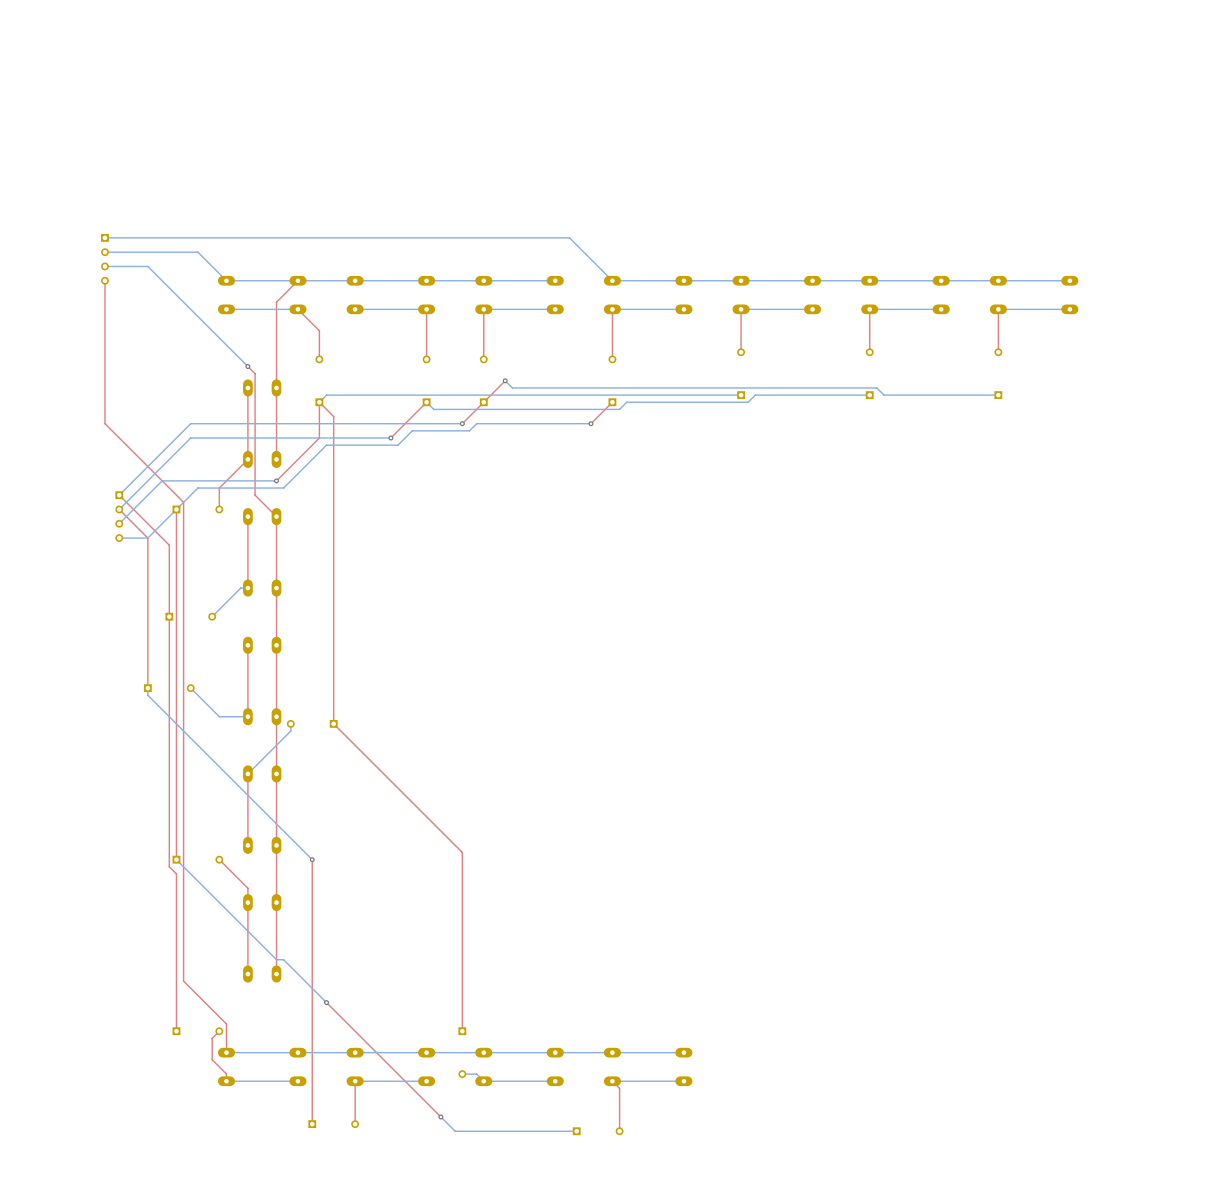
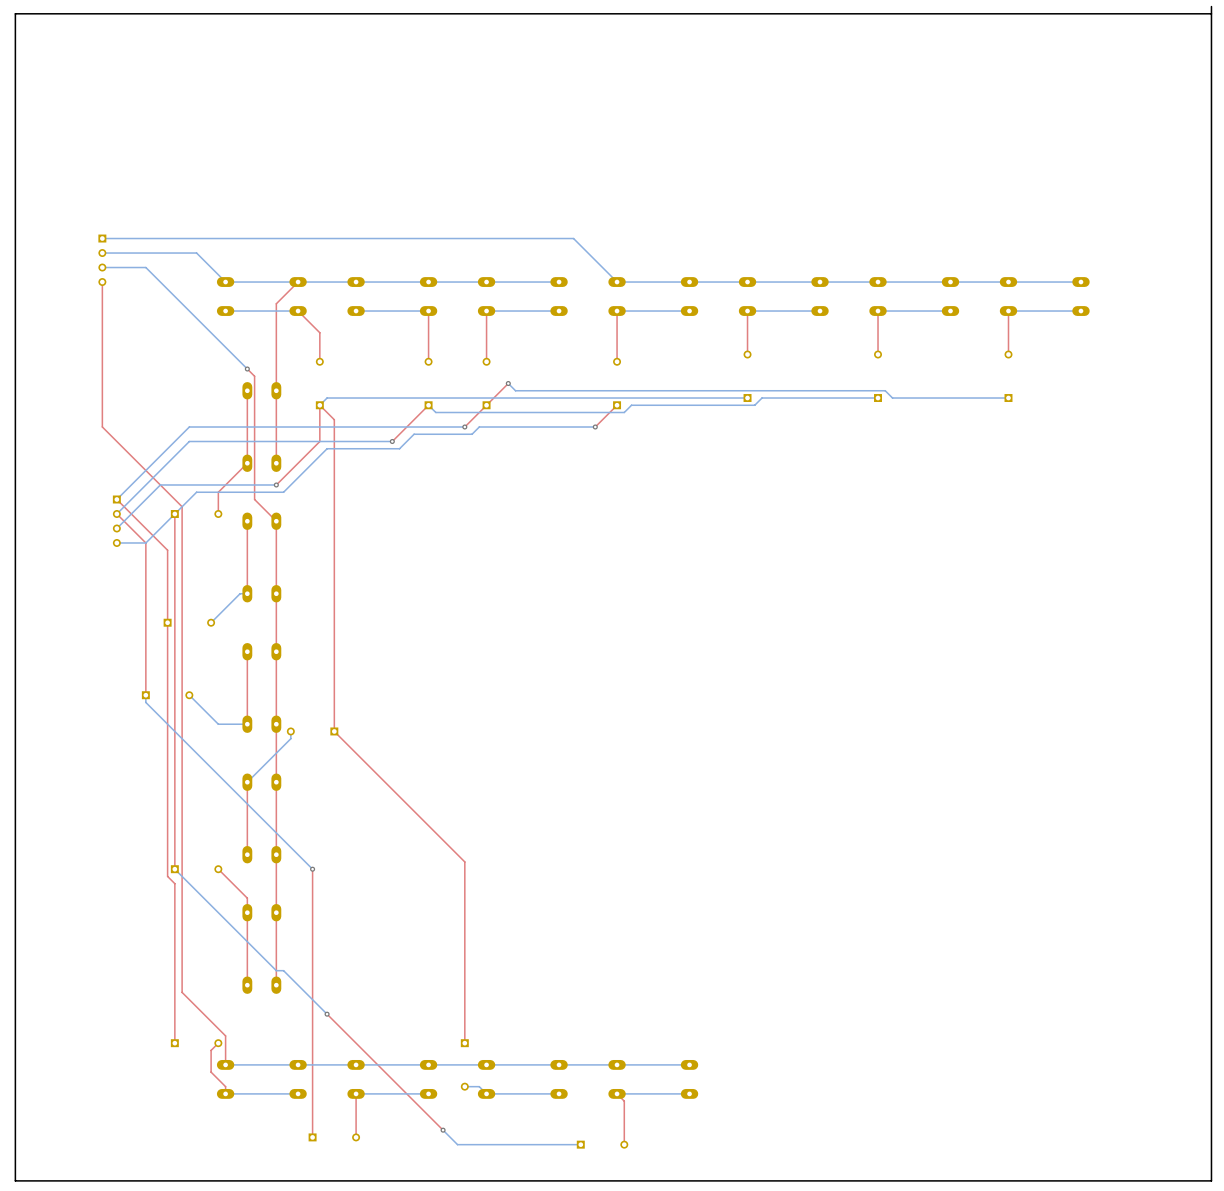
board edge: none -> (1211, 6) (1211, 1180) (15, 1180) (15, 13) (1211, 13)

